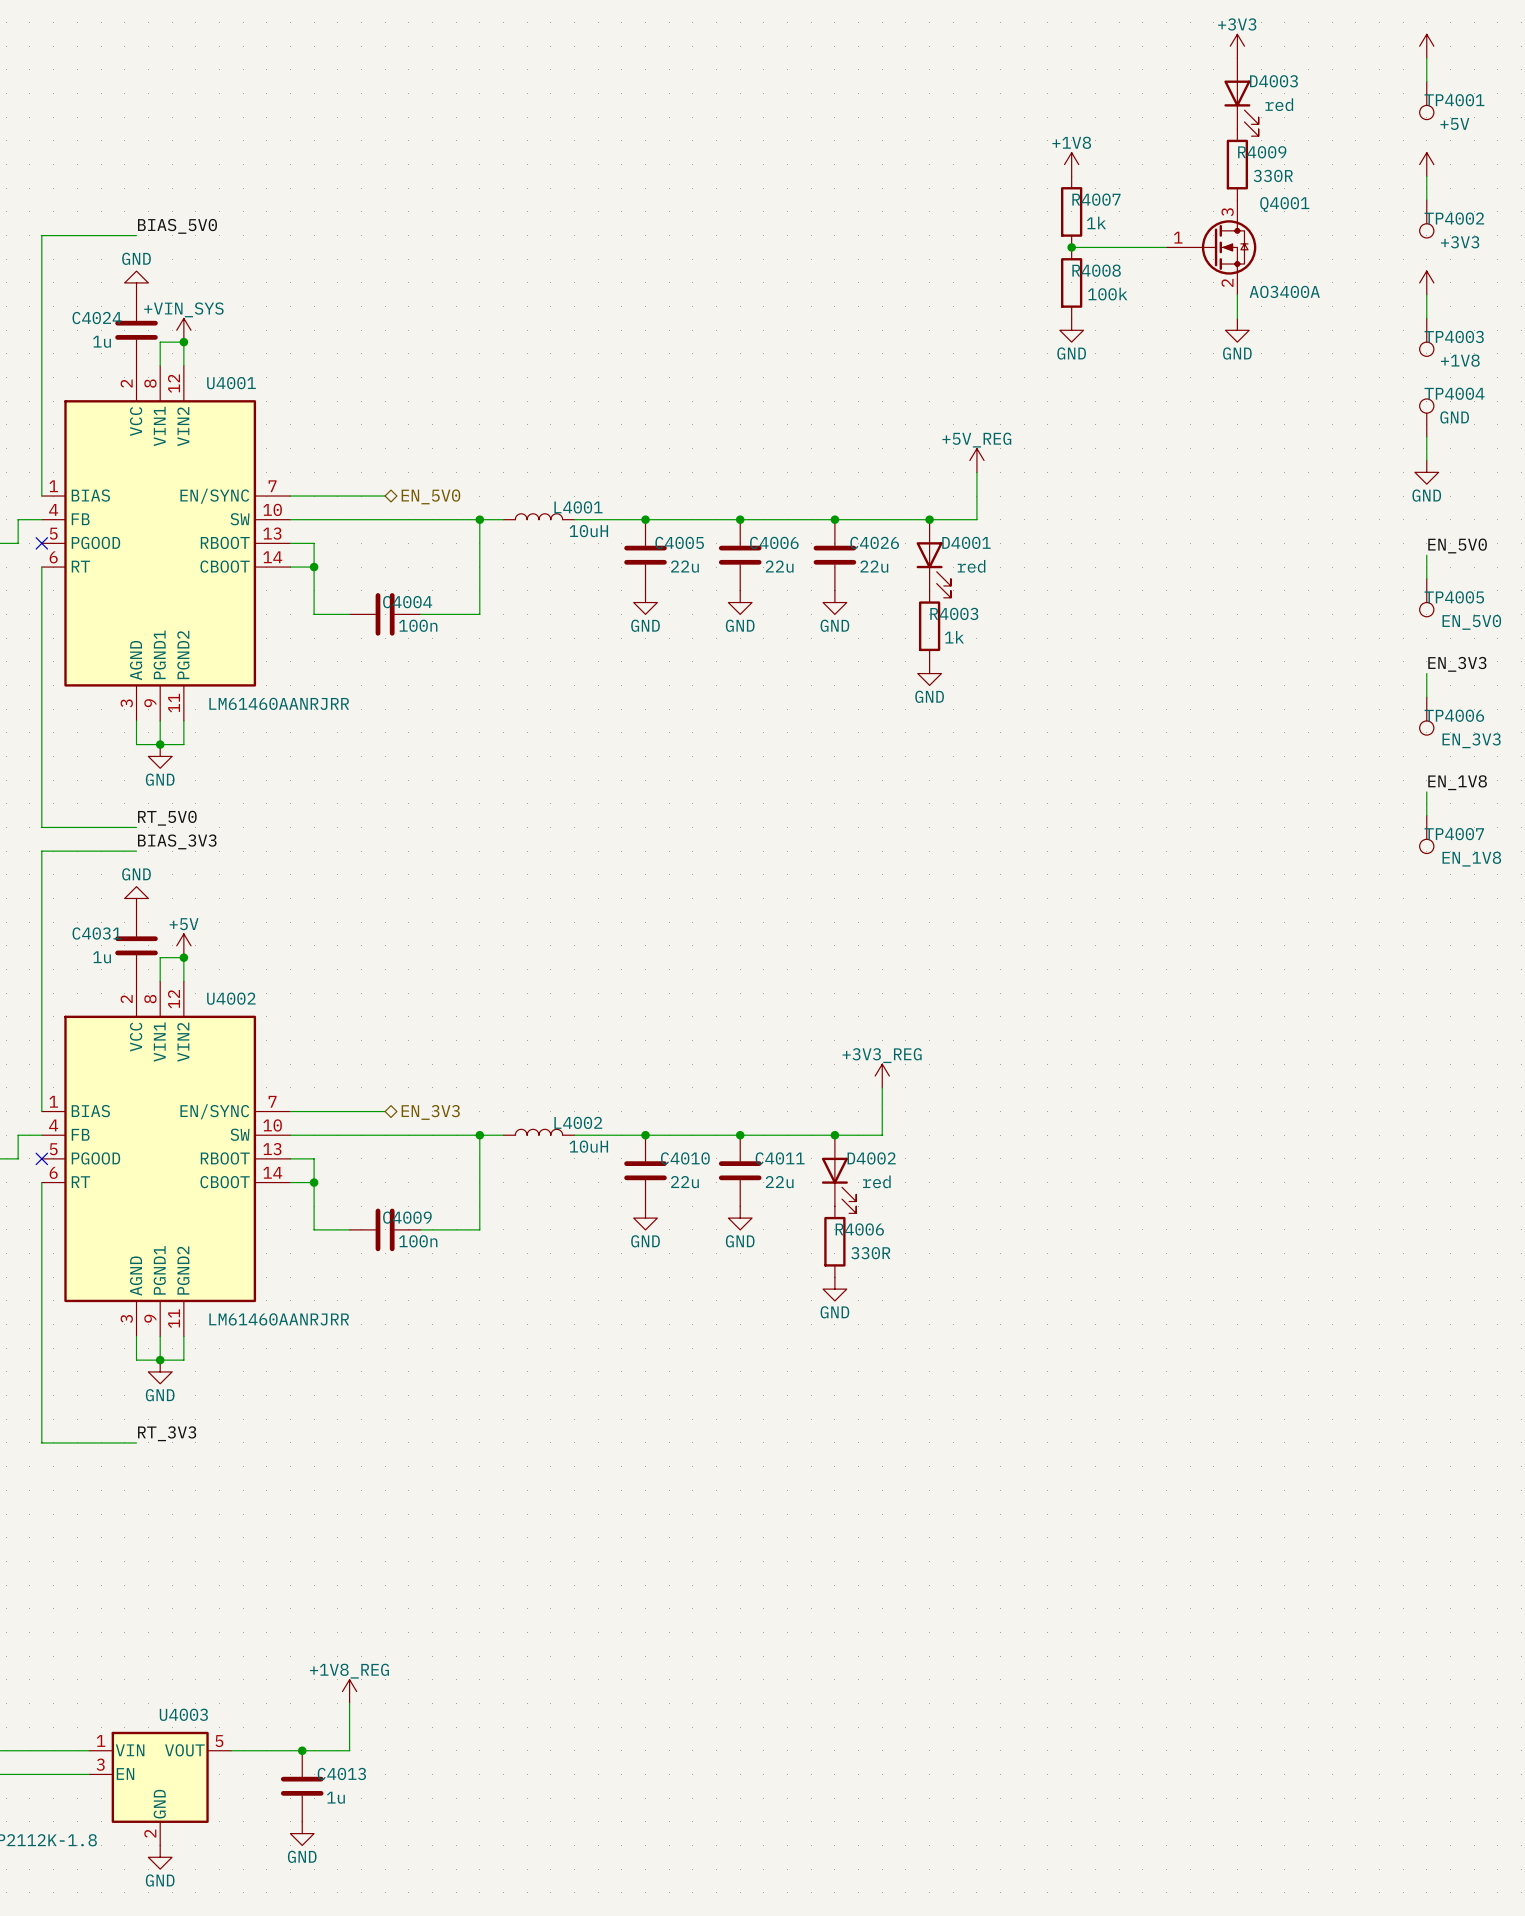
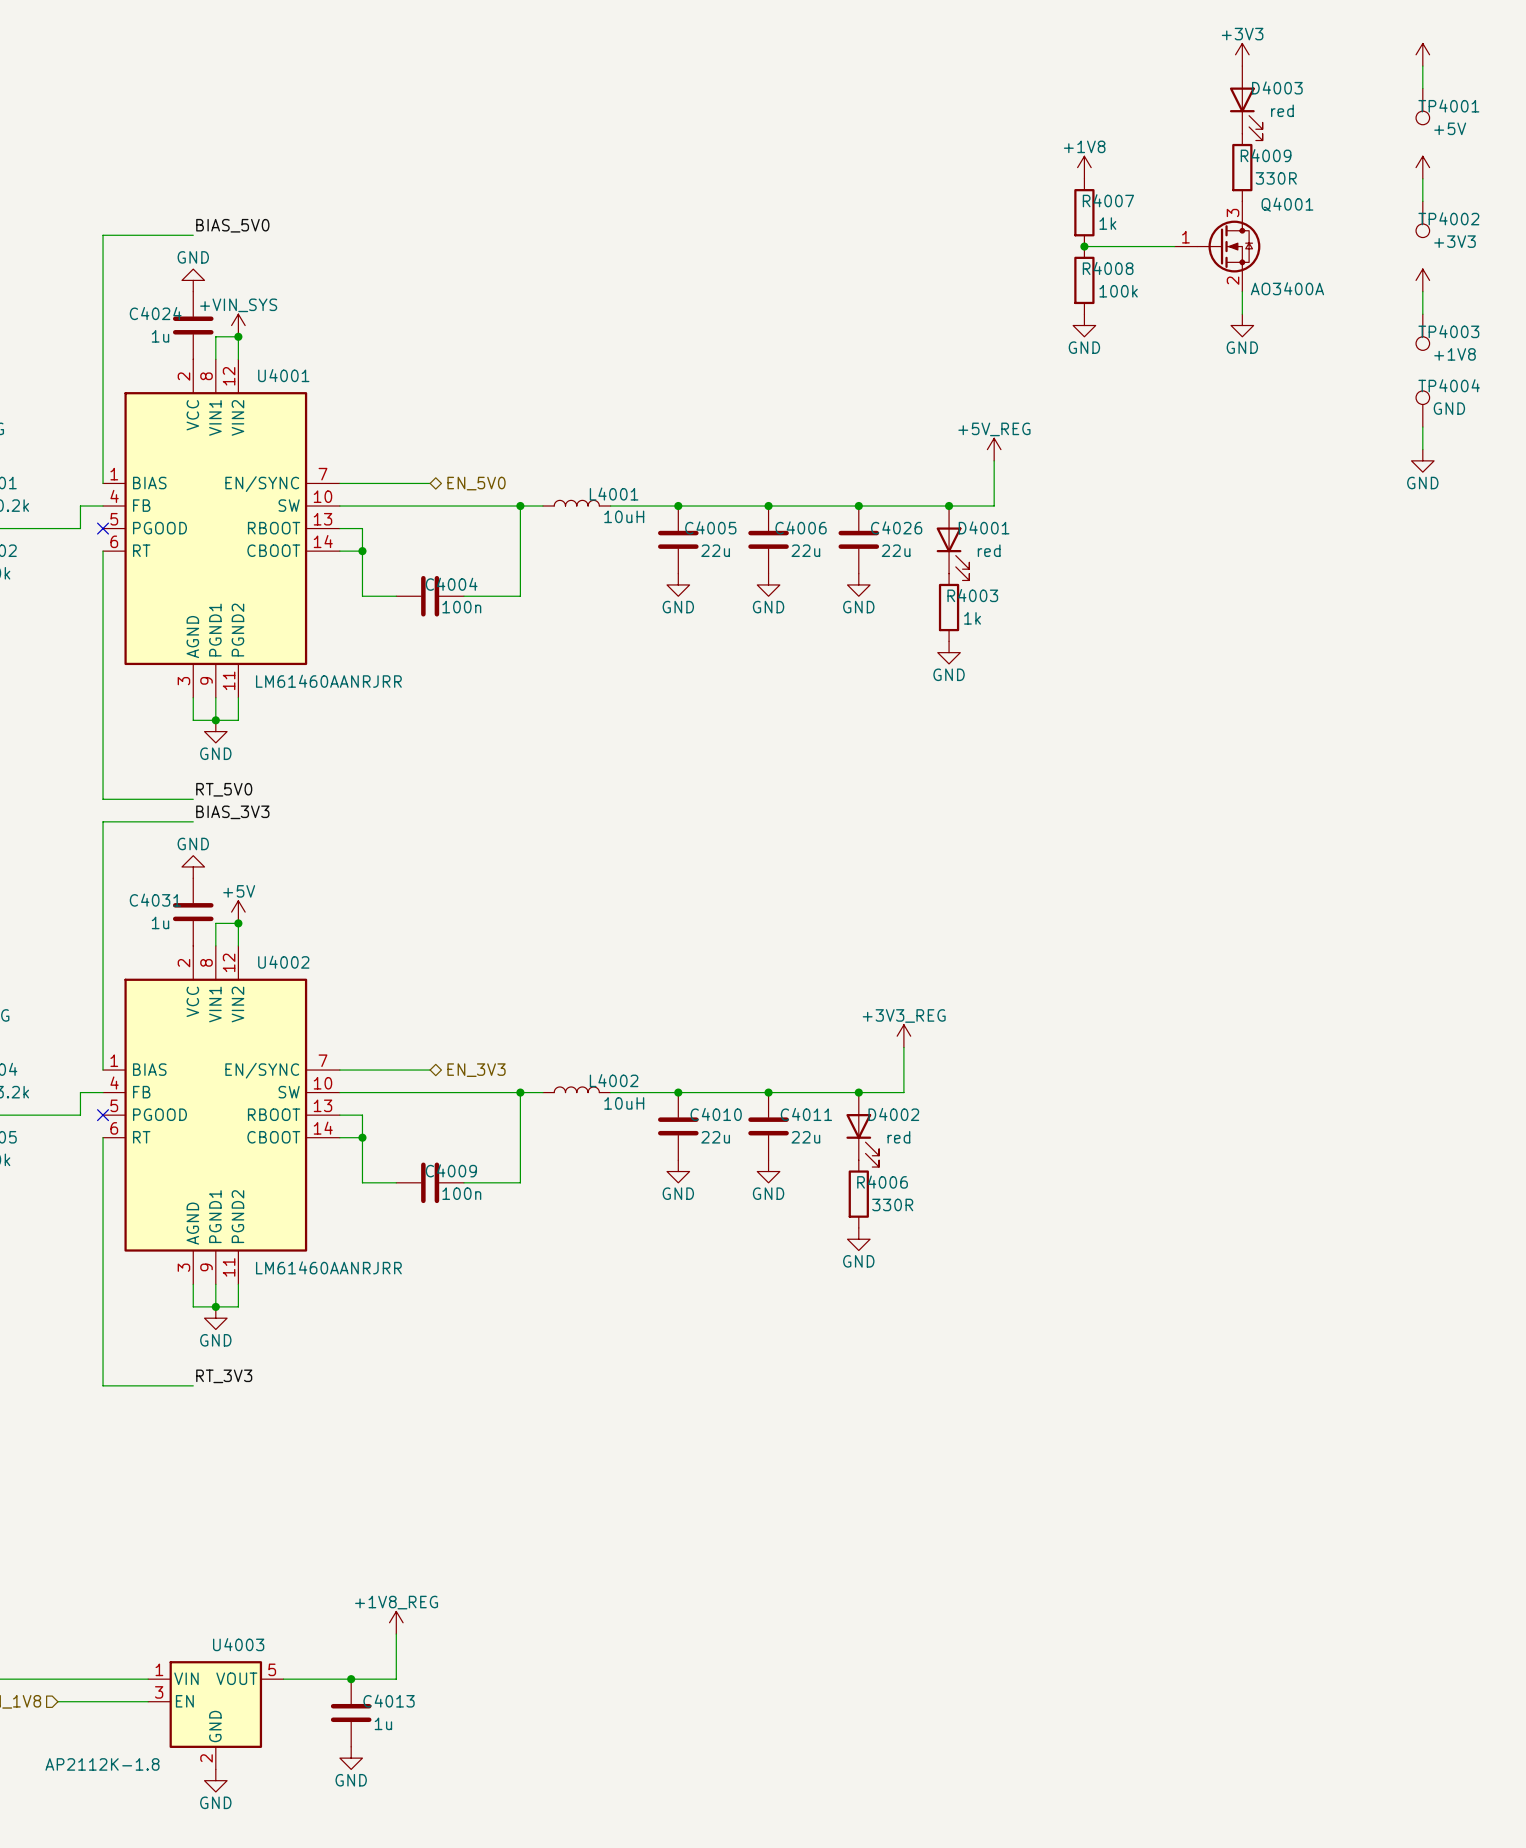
label: EN_5V0 (1457, 545) -> none
wire: (1426, 555) (1426, 578) -> none
TP4005: EN_5V0 (1426, 597) -> none
label: EN_3V3 (1457, 664) -> none
wire: (1426, 673) (1426, 697) -> none
TP4006: EN_3V3 (1426, 716) -> none
label: EN_1V8 (1457, 782) -> none
wire: (1426, 791) (1426, 815) -> none
TP4007: EN_1V8 (1426, 834) -> none

